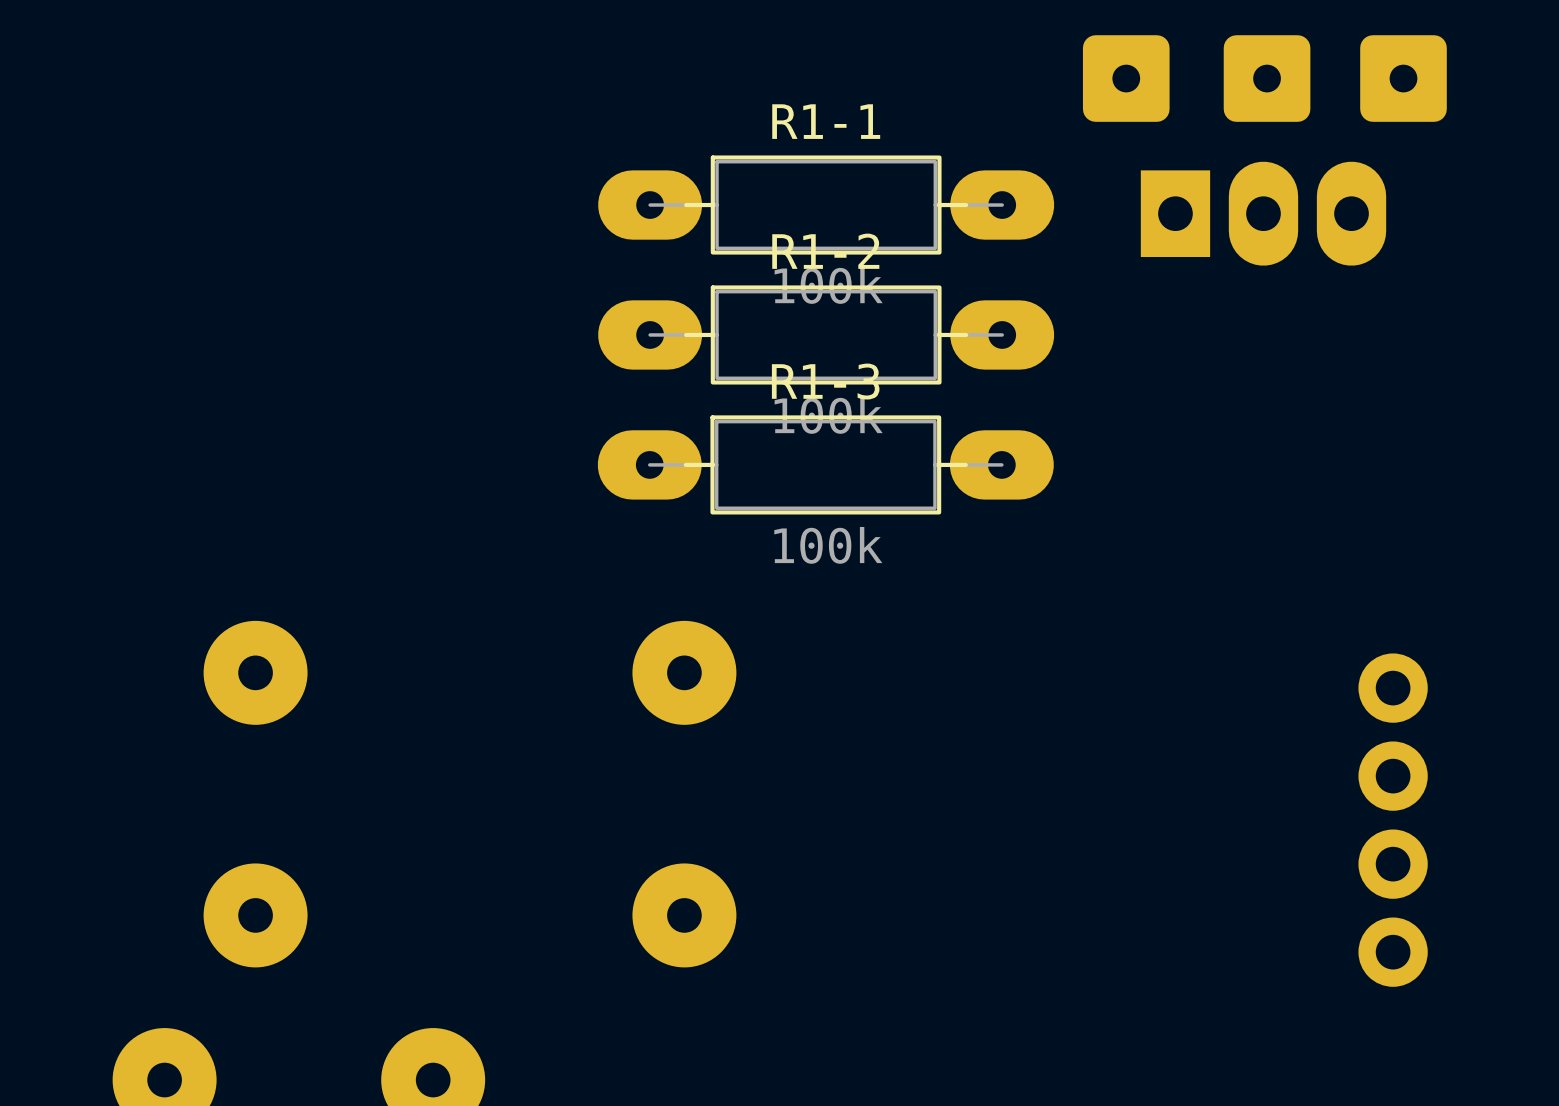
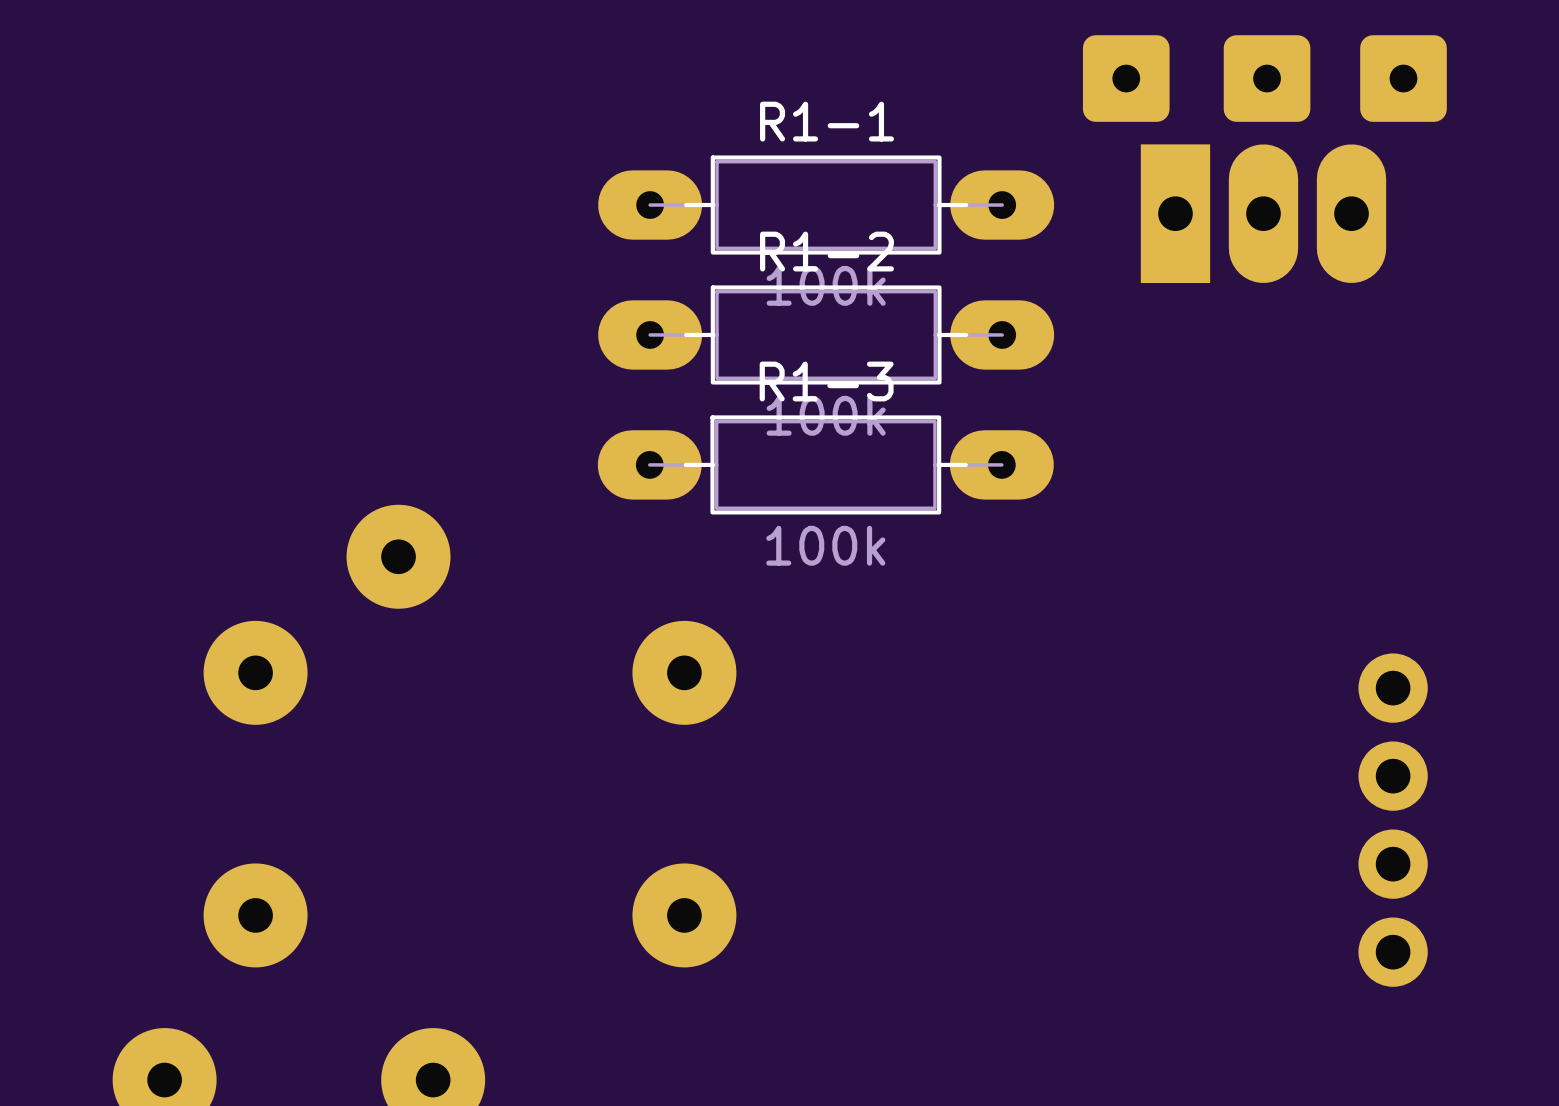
part footprint: [1140, 161, 1387, 266] -> [1140, 144, 1387, 283]
part: none -> (398, 556)

